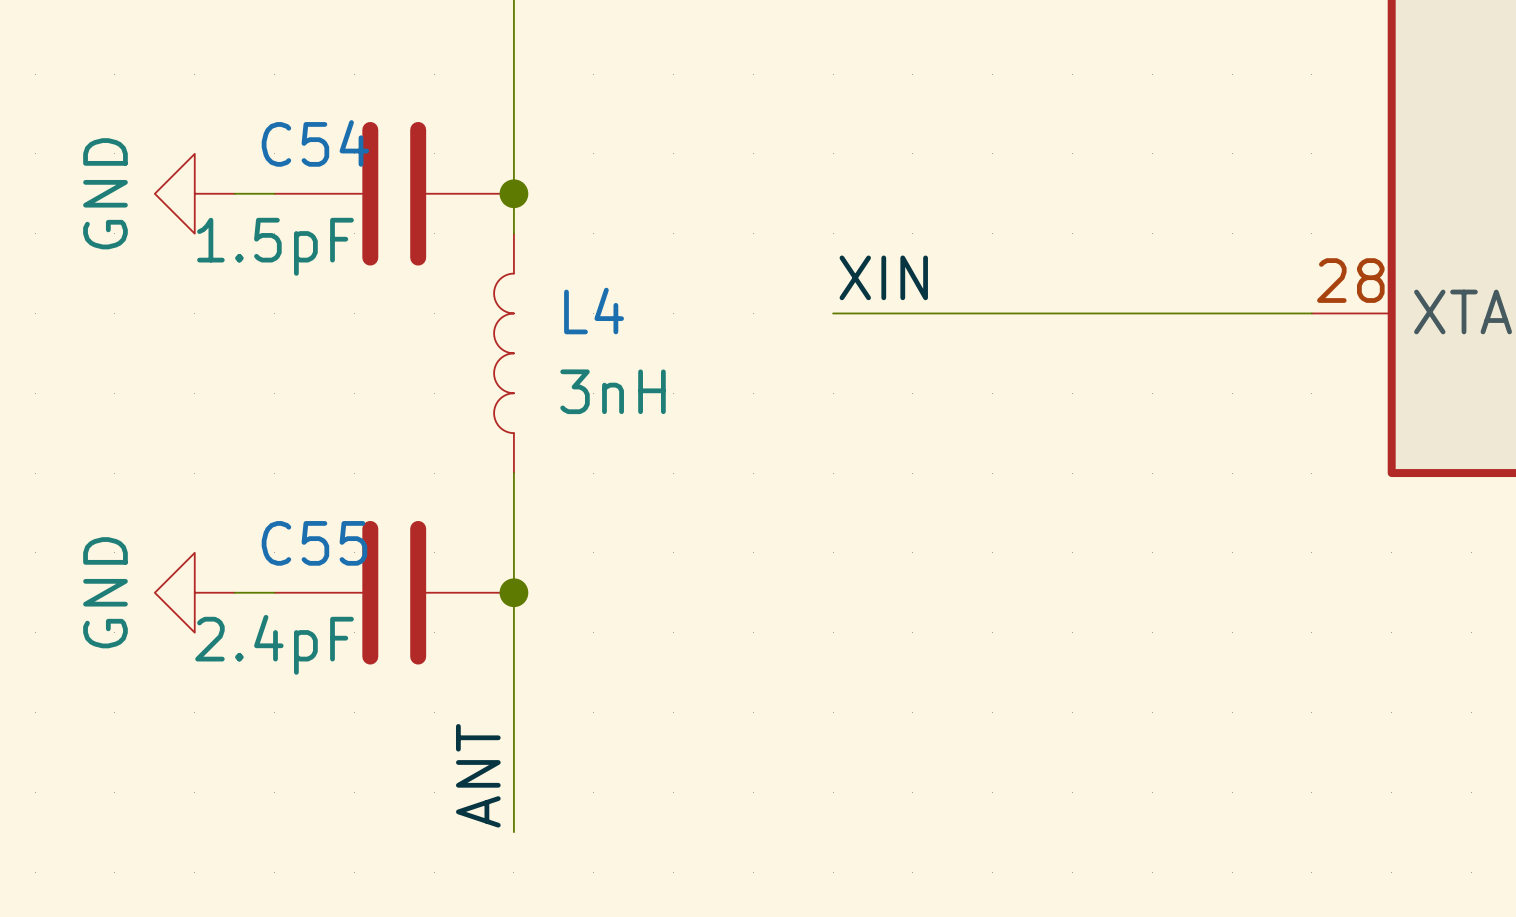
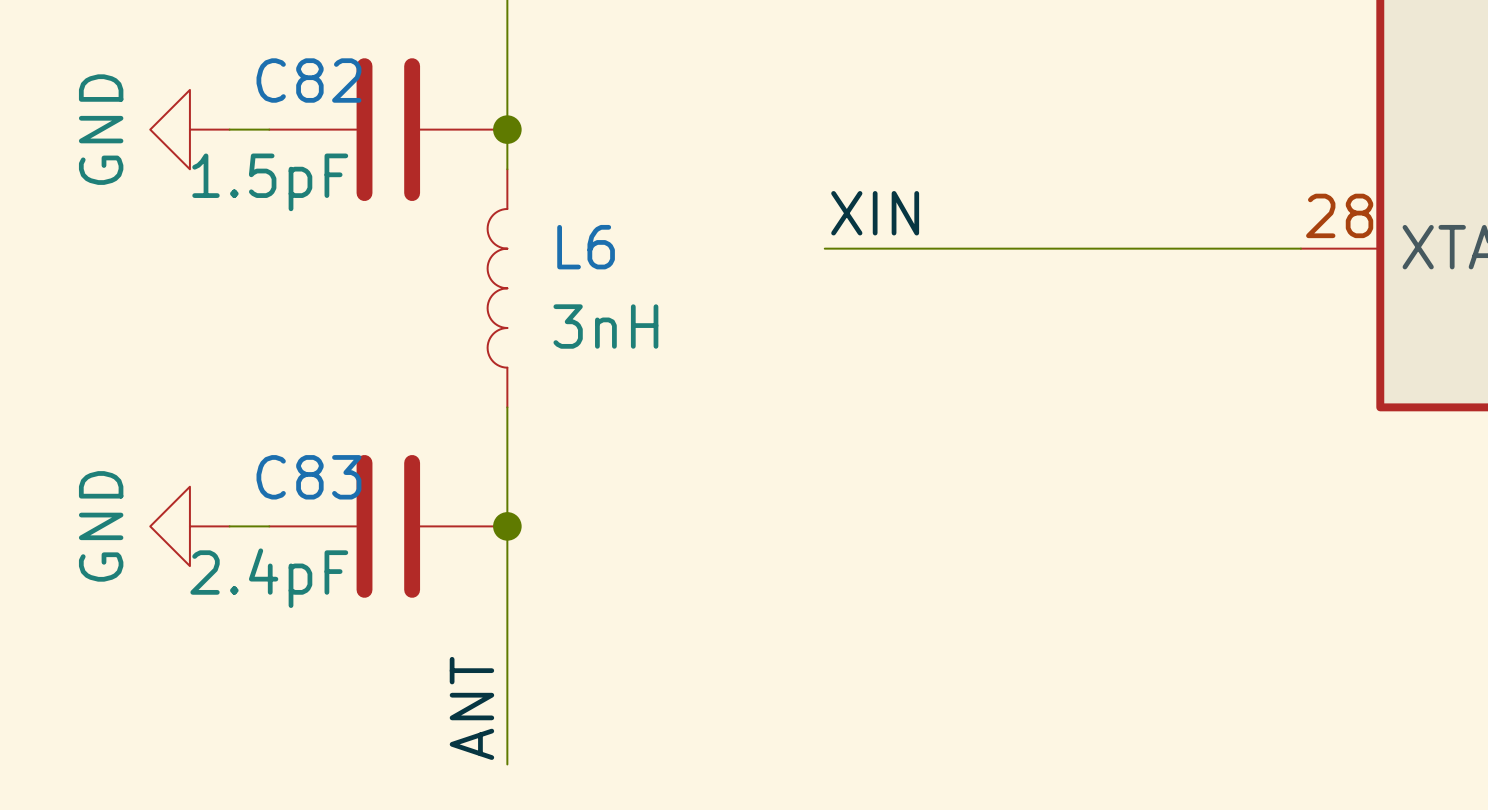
C54 name: C54 (315, 143) -> C82 (308, 80)
L4 name: L4 (594, 311) -> L6 (586, 247)
C55 name: C55 (314, 543) -> C83 (308, 477)

